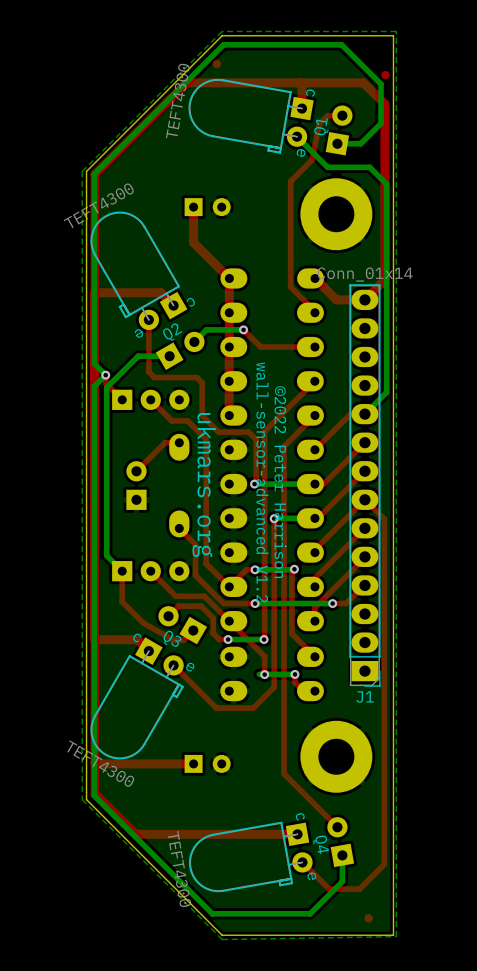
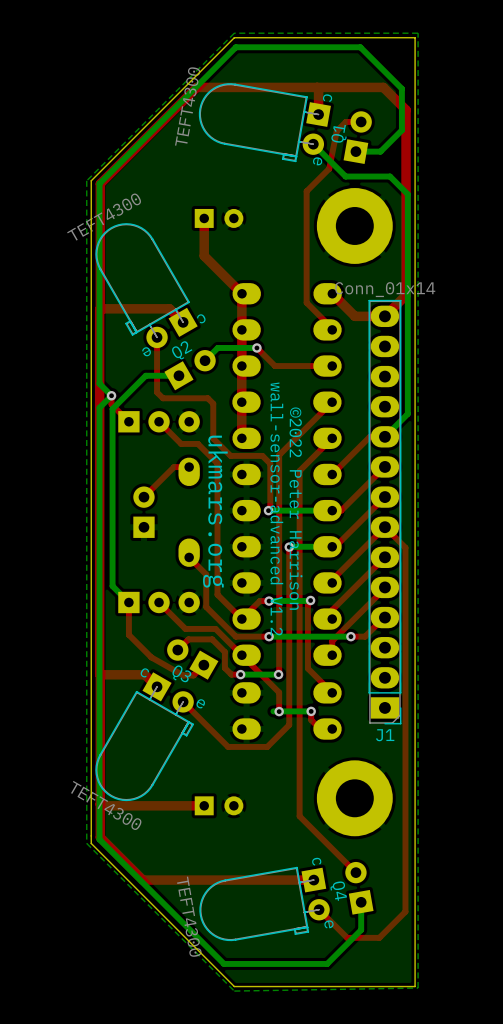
part: (216, 63) -> none
part: (385, 75) -> none
part: (368, 918) -> none

